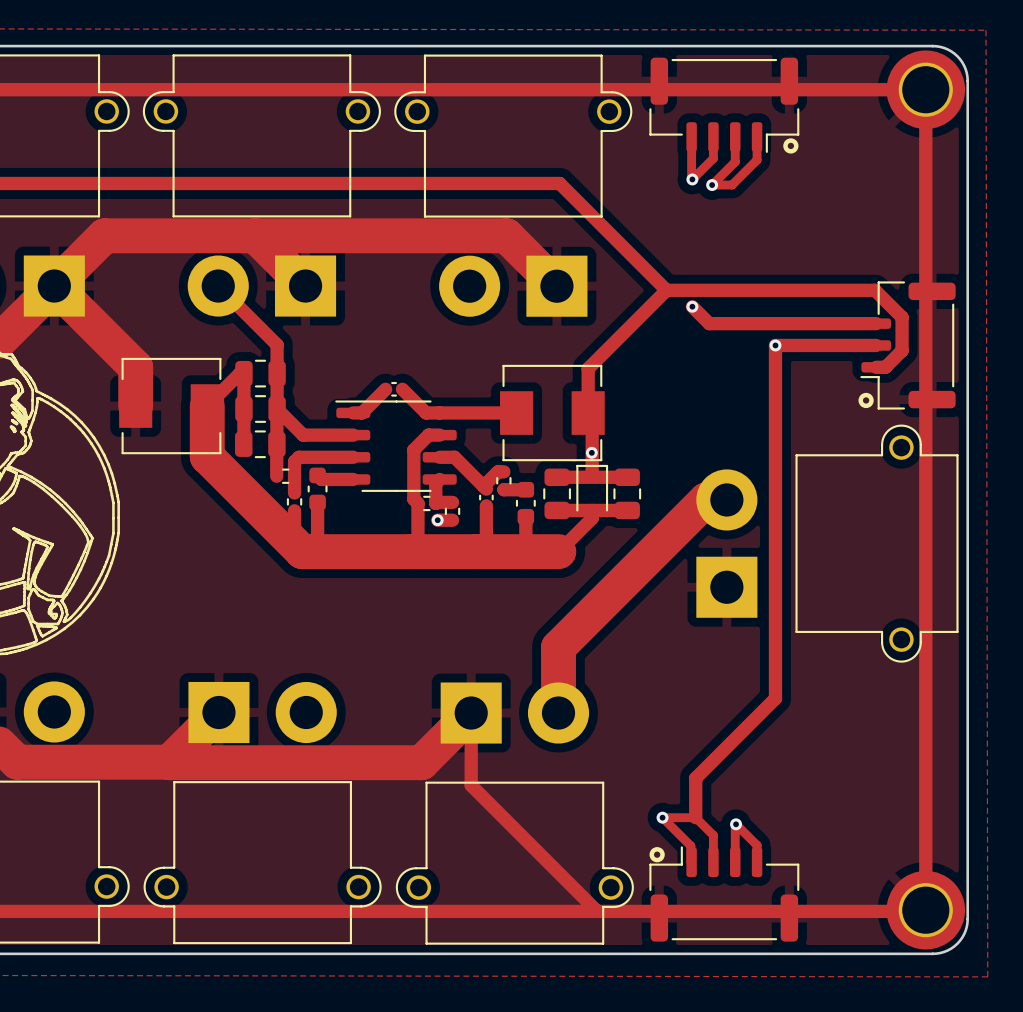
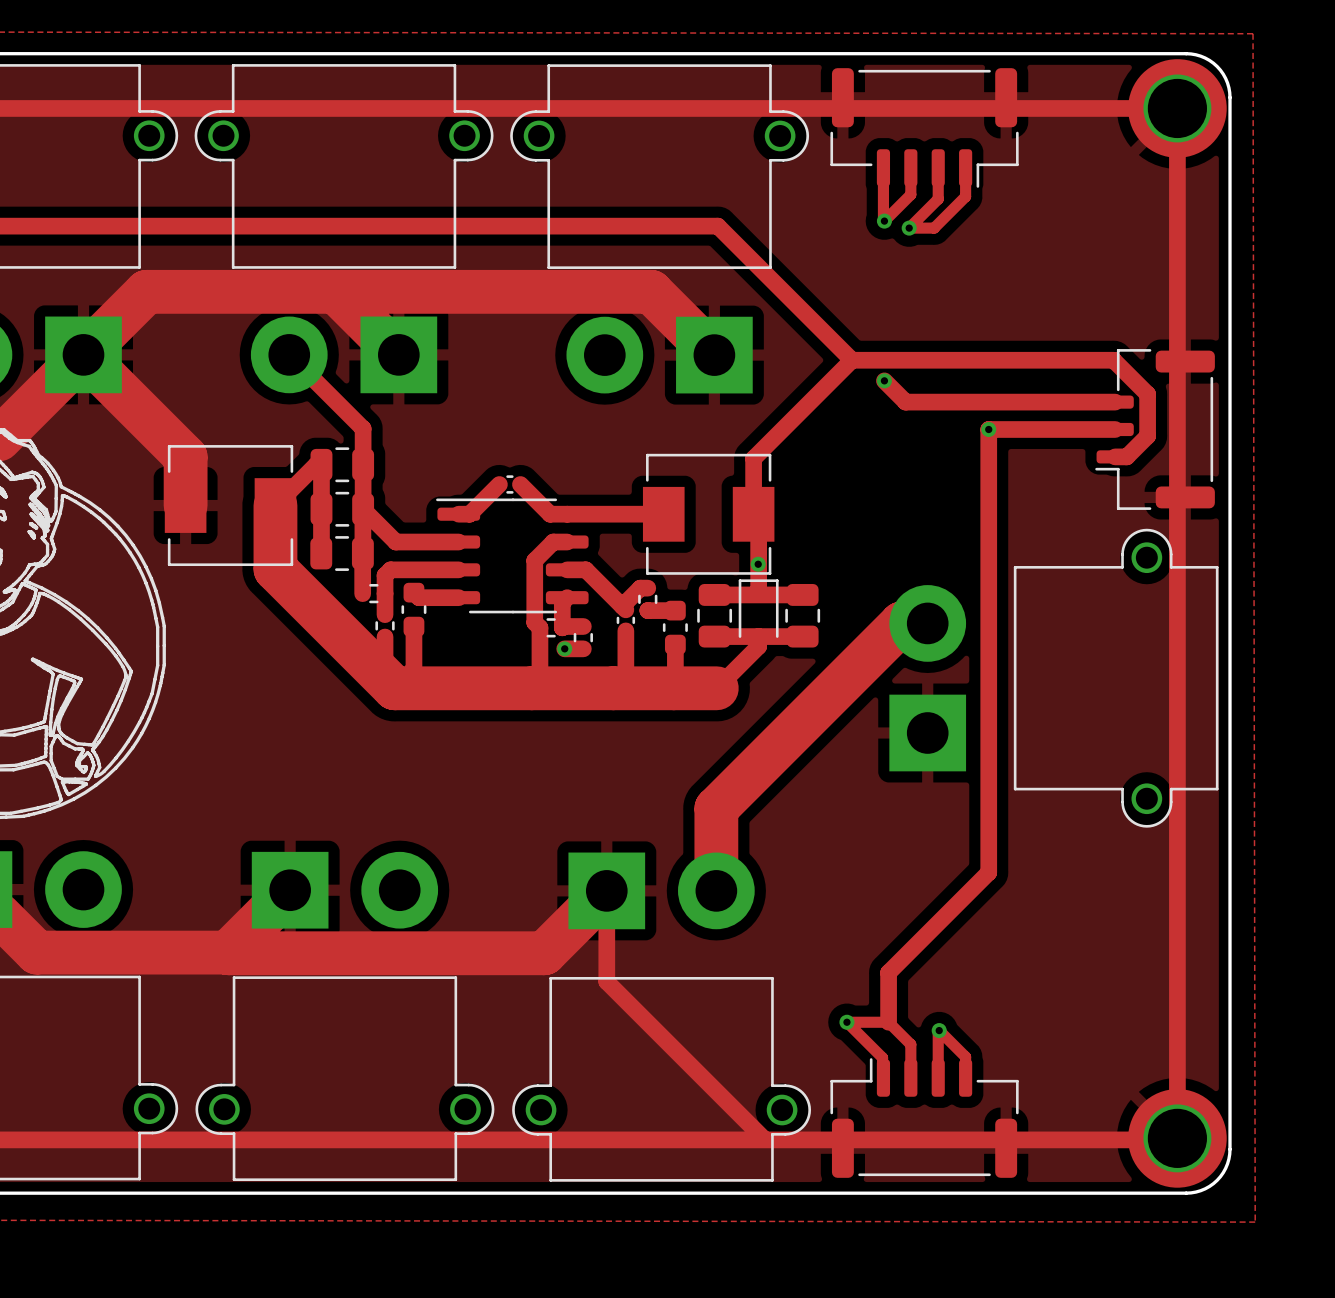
drawing: [783, 138, 799, 154] -> none
drawing: [858, 392, 874, 409] -> none
drawing: [649, 847, 665, 863] -> none

